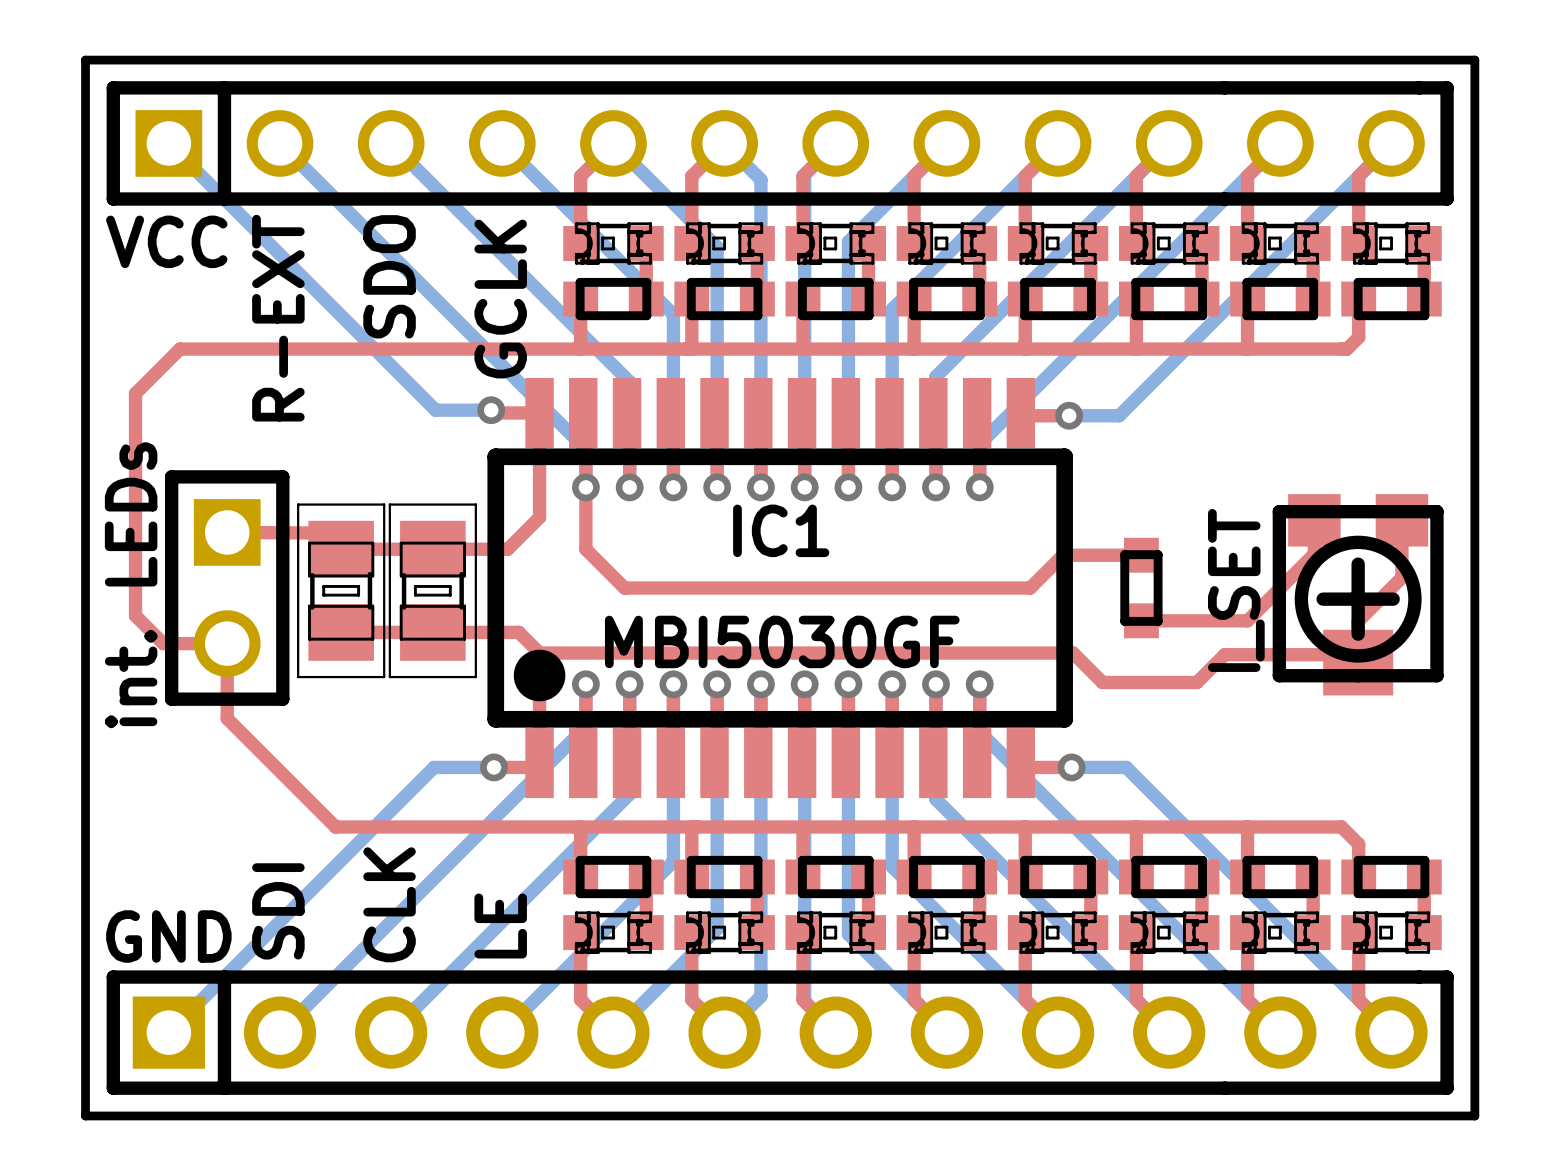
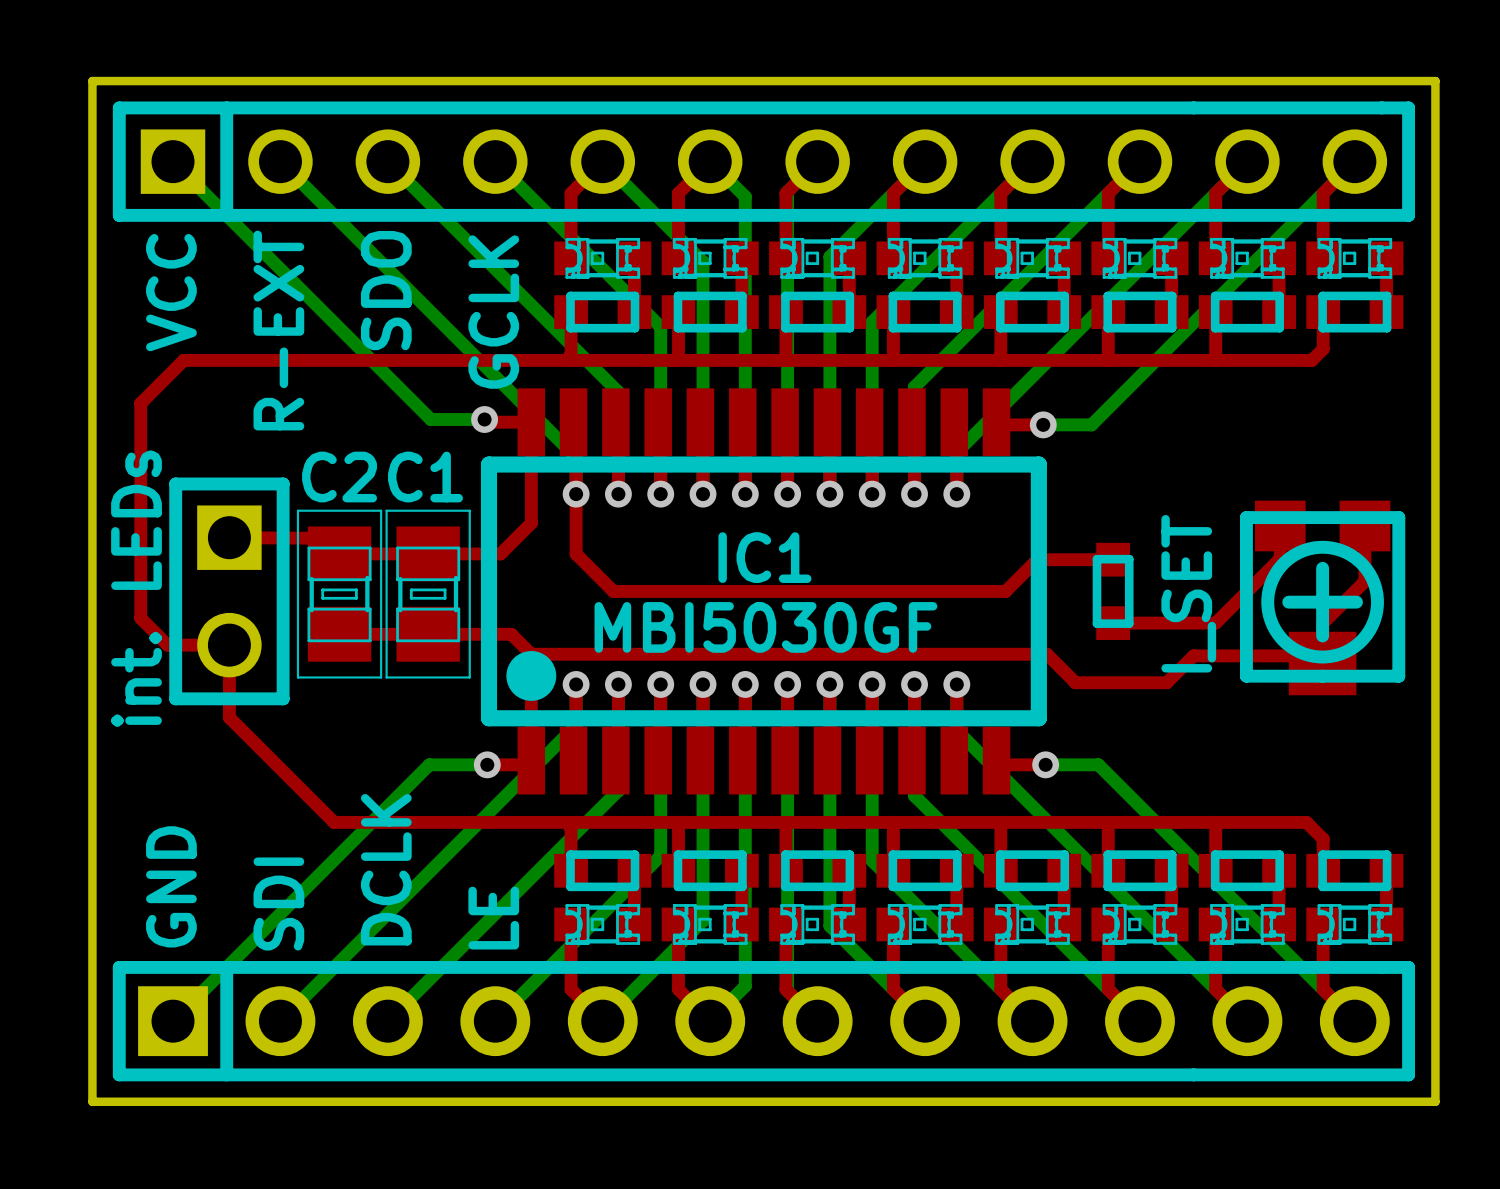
text rotation: 0° (166, 241) -> 90° counterclockwise (171, 292)
C2 name: none -> C2 (339, 477)
C1 name: none -> C1 (425, 477)
IC1 name position: IC1 (781, 530) -> IC1 (764, 557)
text position: I_SET (1236, 590) -> I_SET (1188, 593)
IC1 value position: MBI5030GF (782, 641) -> MBI5030GF (765, 627)
text: CLK (389, 904) -> DCLK (386, 869)
text rotation: 0° (168, 936) -> 90° counterclockwise (171, 886)

